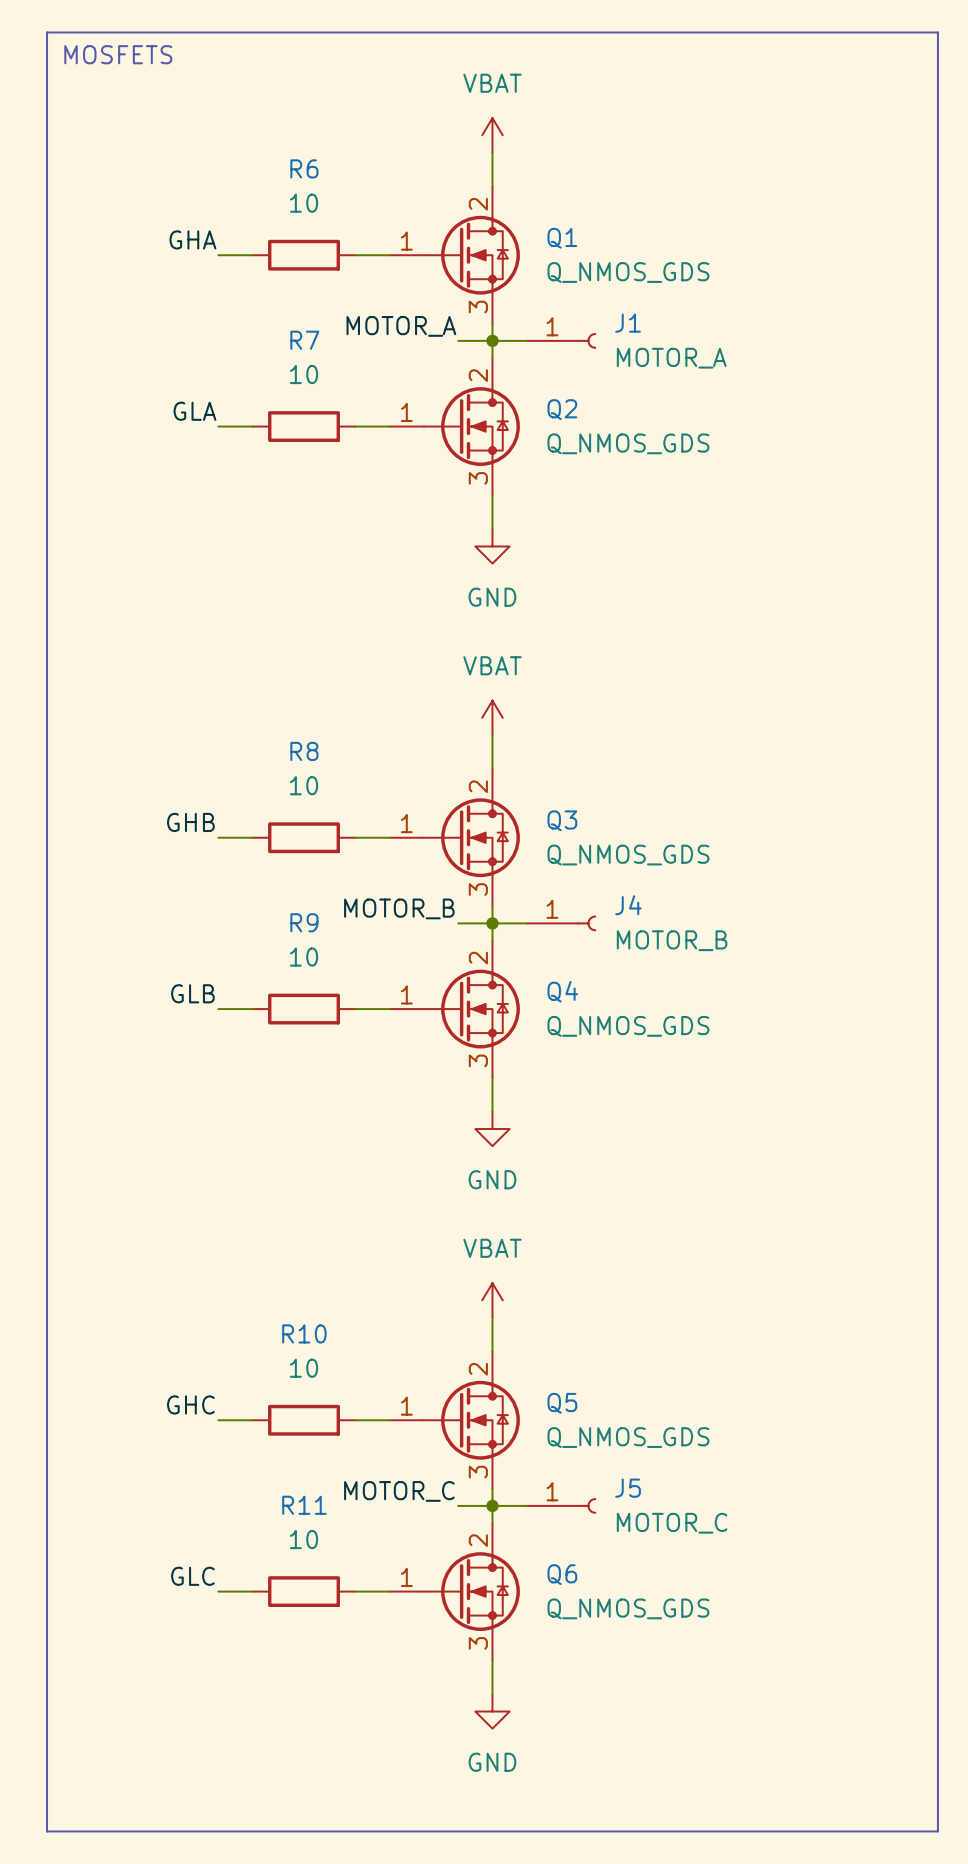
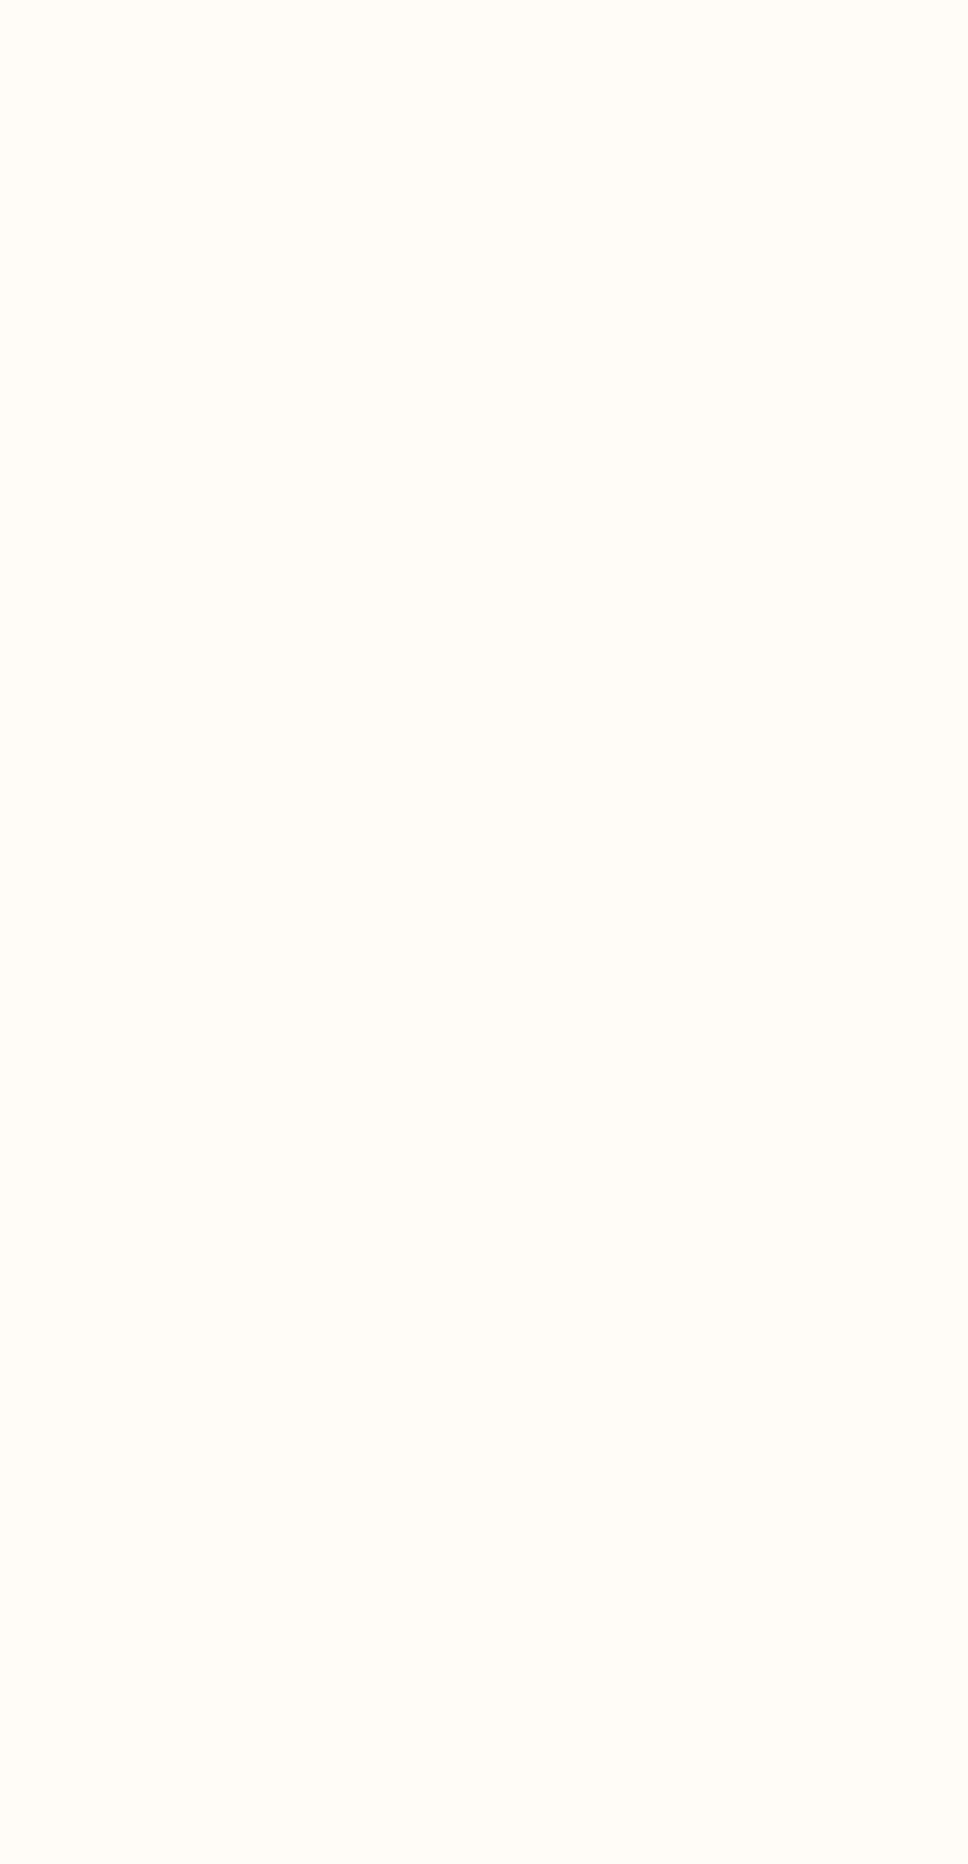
line: (47, 32) (937, 32) (937, 1831) (47, 1831) (47, 32) -> none
text: MOSFETS (118, 54) -> none
power symbol: VBAT (492, 135) -> none
wire: (492, 152) (492, 186) -> none
label: GHA (192, 239) -> none
wire: (218, 255) (252, 255) -> none
R6: 10 (304, 255) -> none
wire: (355, 255) (389, 255) -> none
Q1: Q_NMOS_GDS (454, 255) -> none
wire: (492, 323) (492, 358) -> none
label: MOTOR_A (401, 326) -> none
wire: (458, 340) (526, 340) -> none
junction: (492, 340) -> none
J1: MOTOR_A (561, 340) -> none
label: GLA (194, 411) -> none
wire: (218, 426) (252, 426) -> none
R7: 10 (304, 426) -> none
wire: (355, 426) (389, 426) -> none
Q2: Q_NMOS_GDS (454, 426) -> none
wire: (492, 495) (492, 529) -> none
power symbol: GND (492, 546) -> none
power symbol: VBAT (492, 717) -> none
wire: (492, 734) (492, 769) -> none
label: GHB (190, 822) -> none
wire: (218, 837) (252, 837) -> none
R8: 10 (304, 837) -> none
wire: (355, 837) (389, 837) -> none
Q3: Q_NMOS_GDS (454, 837) -> none
wire: (492, 906) (492, 940) -> none
label: MOTOR_B (399, 908) -> none
wire: (458, 923) (526, 923) -> none
junction: (492, 923) -> none
J4: MOTOR_B (561, 923) -> none
label: GLB (192, 993) -> none
wire: (218, 1009) (252, 1009) -> none
R9: 10 (304, 1009) -> none
wire: (355, 1009) (389, 1009) -> none
Q4: Q_NMOS_GDS (454, 1009) -> none
wire: (492, 1077) (492, 1111) -> none
power symbol: GND (492, 1129) -> none
power symbol: VBAT (492, 1300) -> none
wire: (492, 1317) (492, 1351) -> none
label: GHC (190, 1404) -> none
wire: (218, 1420) (252, 1420) -> none
R10: 10 (304, 1420) -> none
wire: (355, 1420) (389, 1420) -> none
Q5: Q_NMOS_GDS (454, 1420) -> none
wire: (492, 1488) (492, 1523) -> none
label: MOTOR_C (399, 1491) -> none
wire: (458, 1505) (526, 1505) -> none
junction: (492, 1505) -> none
J5: MOTOR_C (561, 1505) -> none
label: GLC (192, 1576) -> none
wire: (218, 1591) (252, 1591) -> none
R11: 10 (304, 1591) -> none
wire: (355, 1591) (389, 1591) -> none
Q6: Q_NMOS_GDS (454, 1591) -> none
wire: (492, 1660) (492, 1694) -> none
power symbol: GND (492, 1711) -> none

